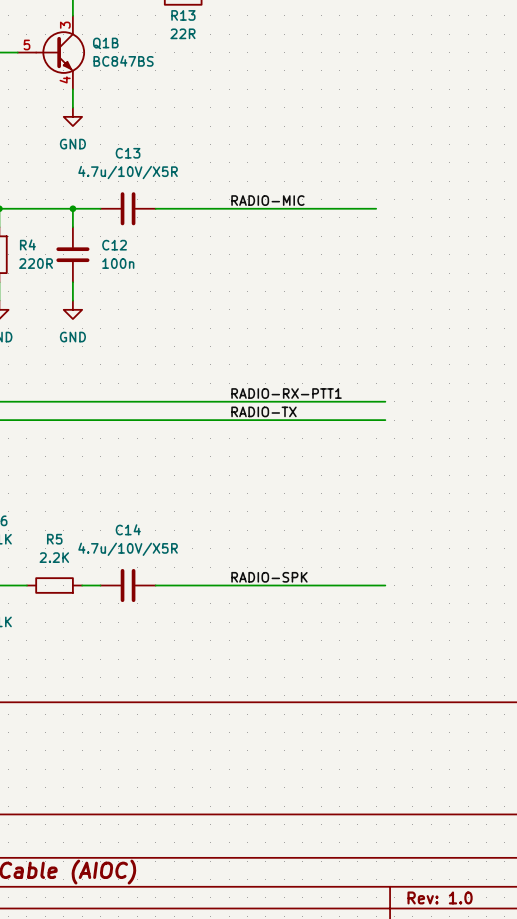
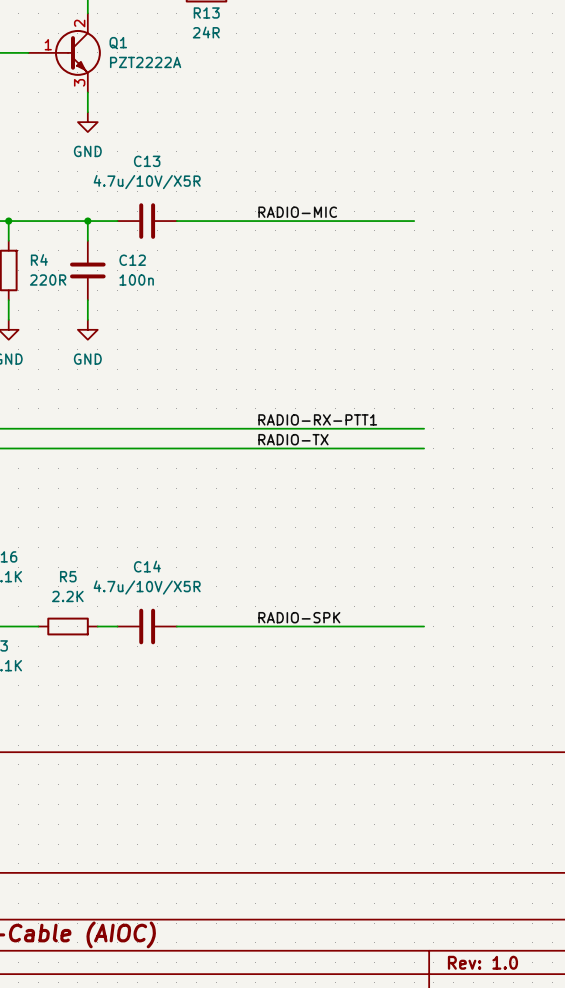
R13 value: 22R (182, 33) -> 24R (206, 32)
Q1B: BC847BS (51, 52) -> none
Q1: none -> PZT2222A (64, 52)

